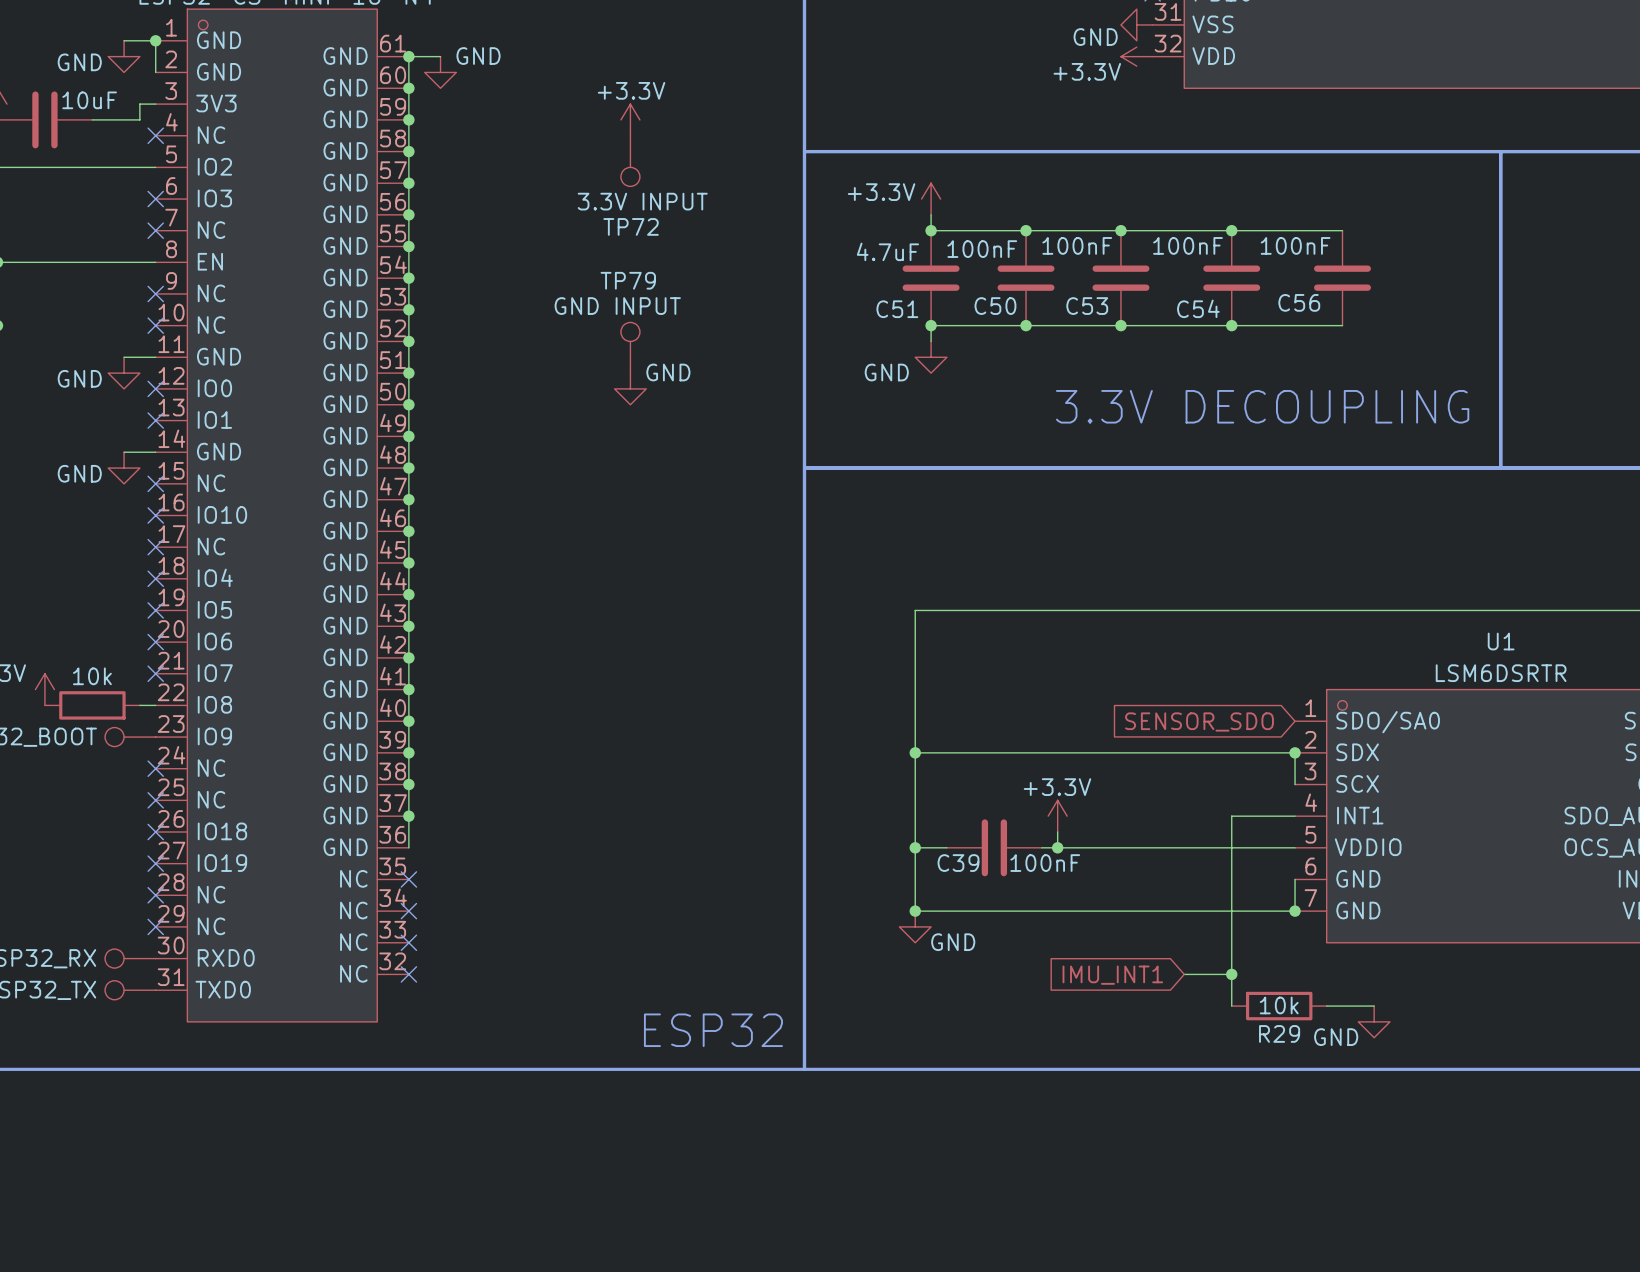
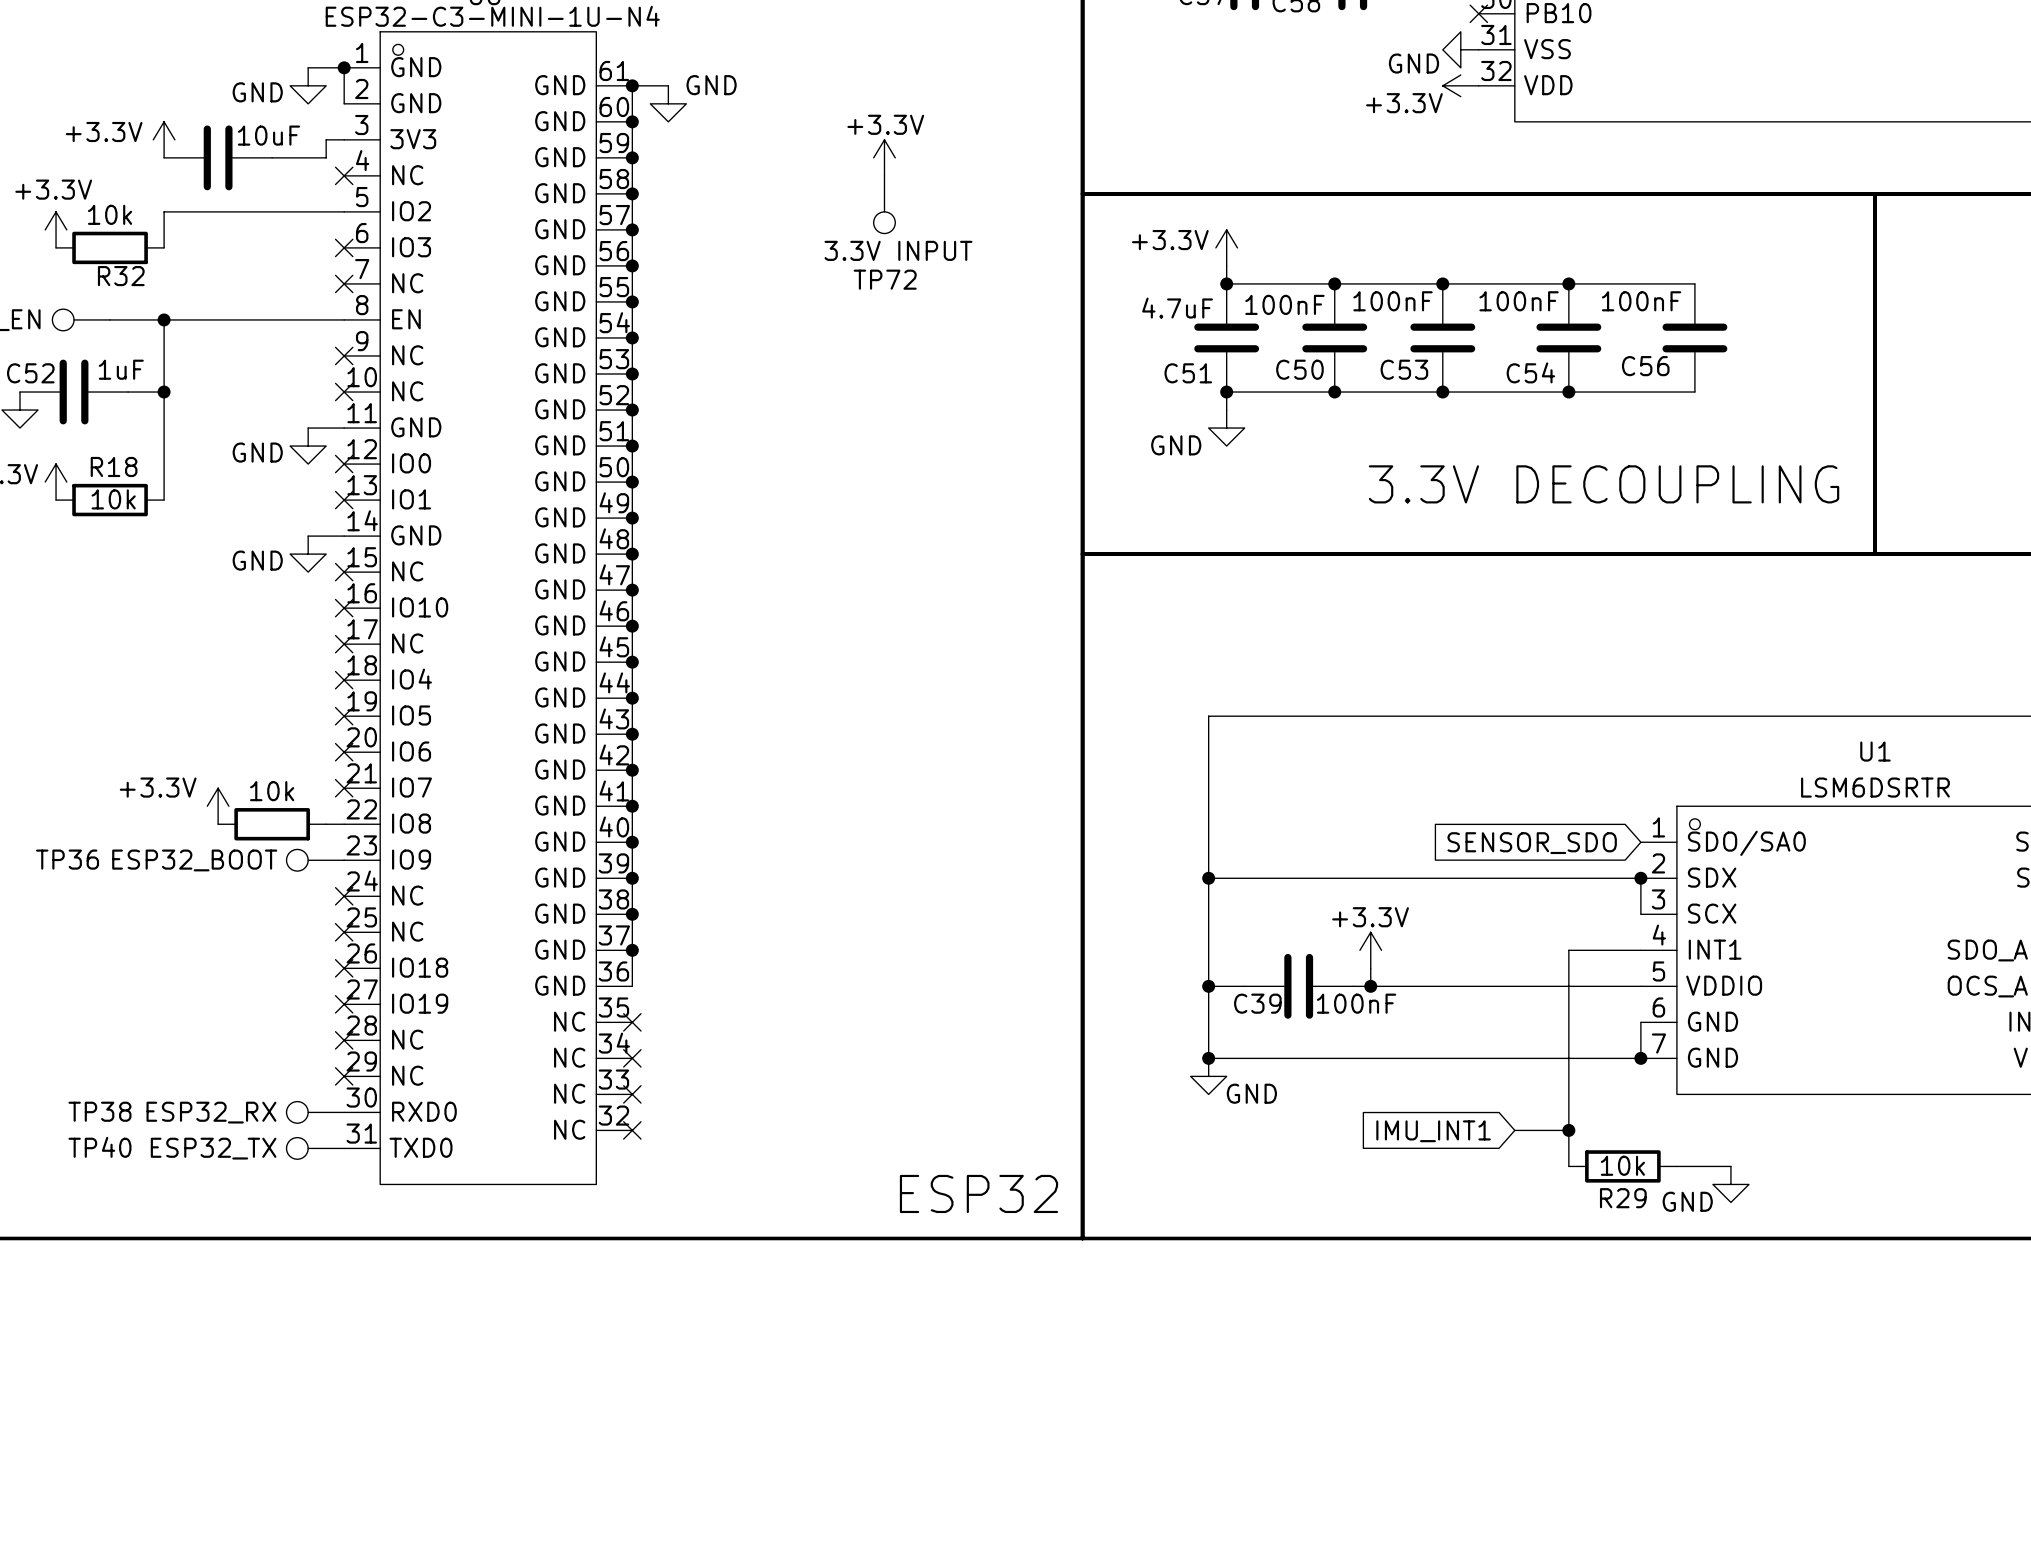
TP79: GND INPUT (630, 347) -> none
power symbol: GND (630, 388) -> none

